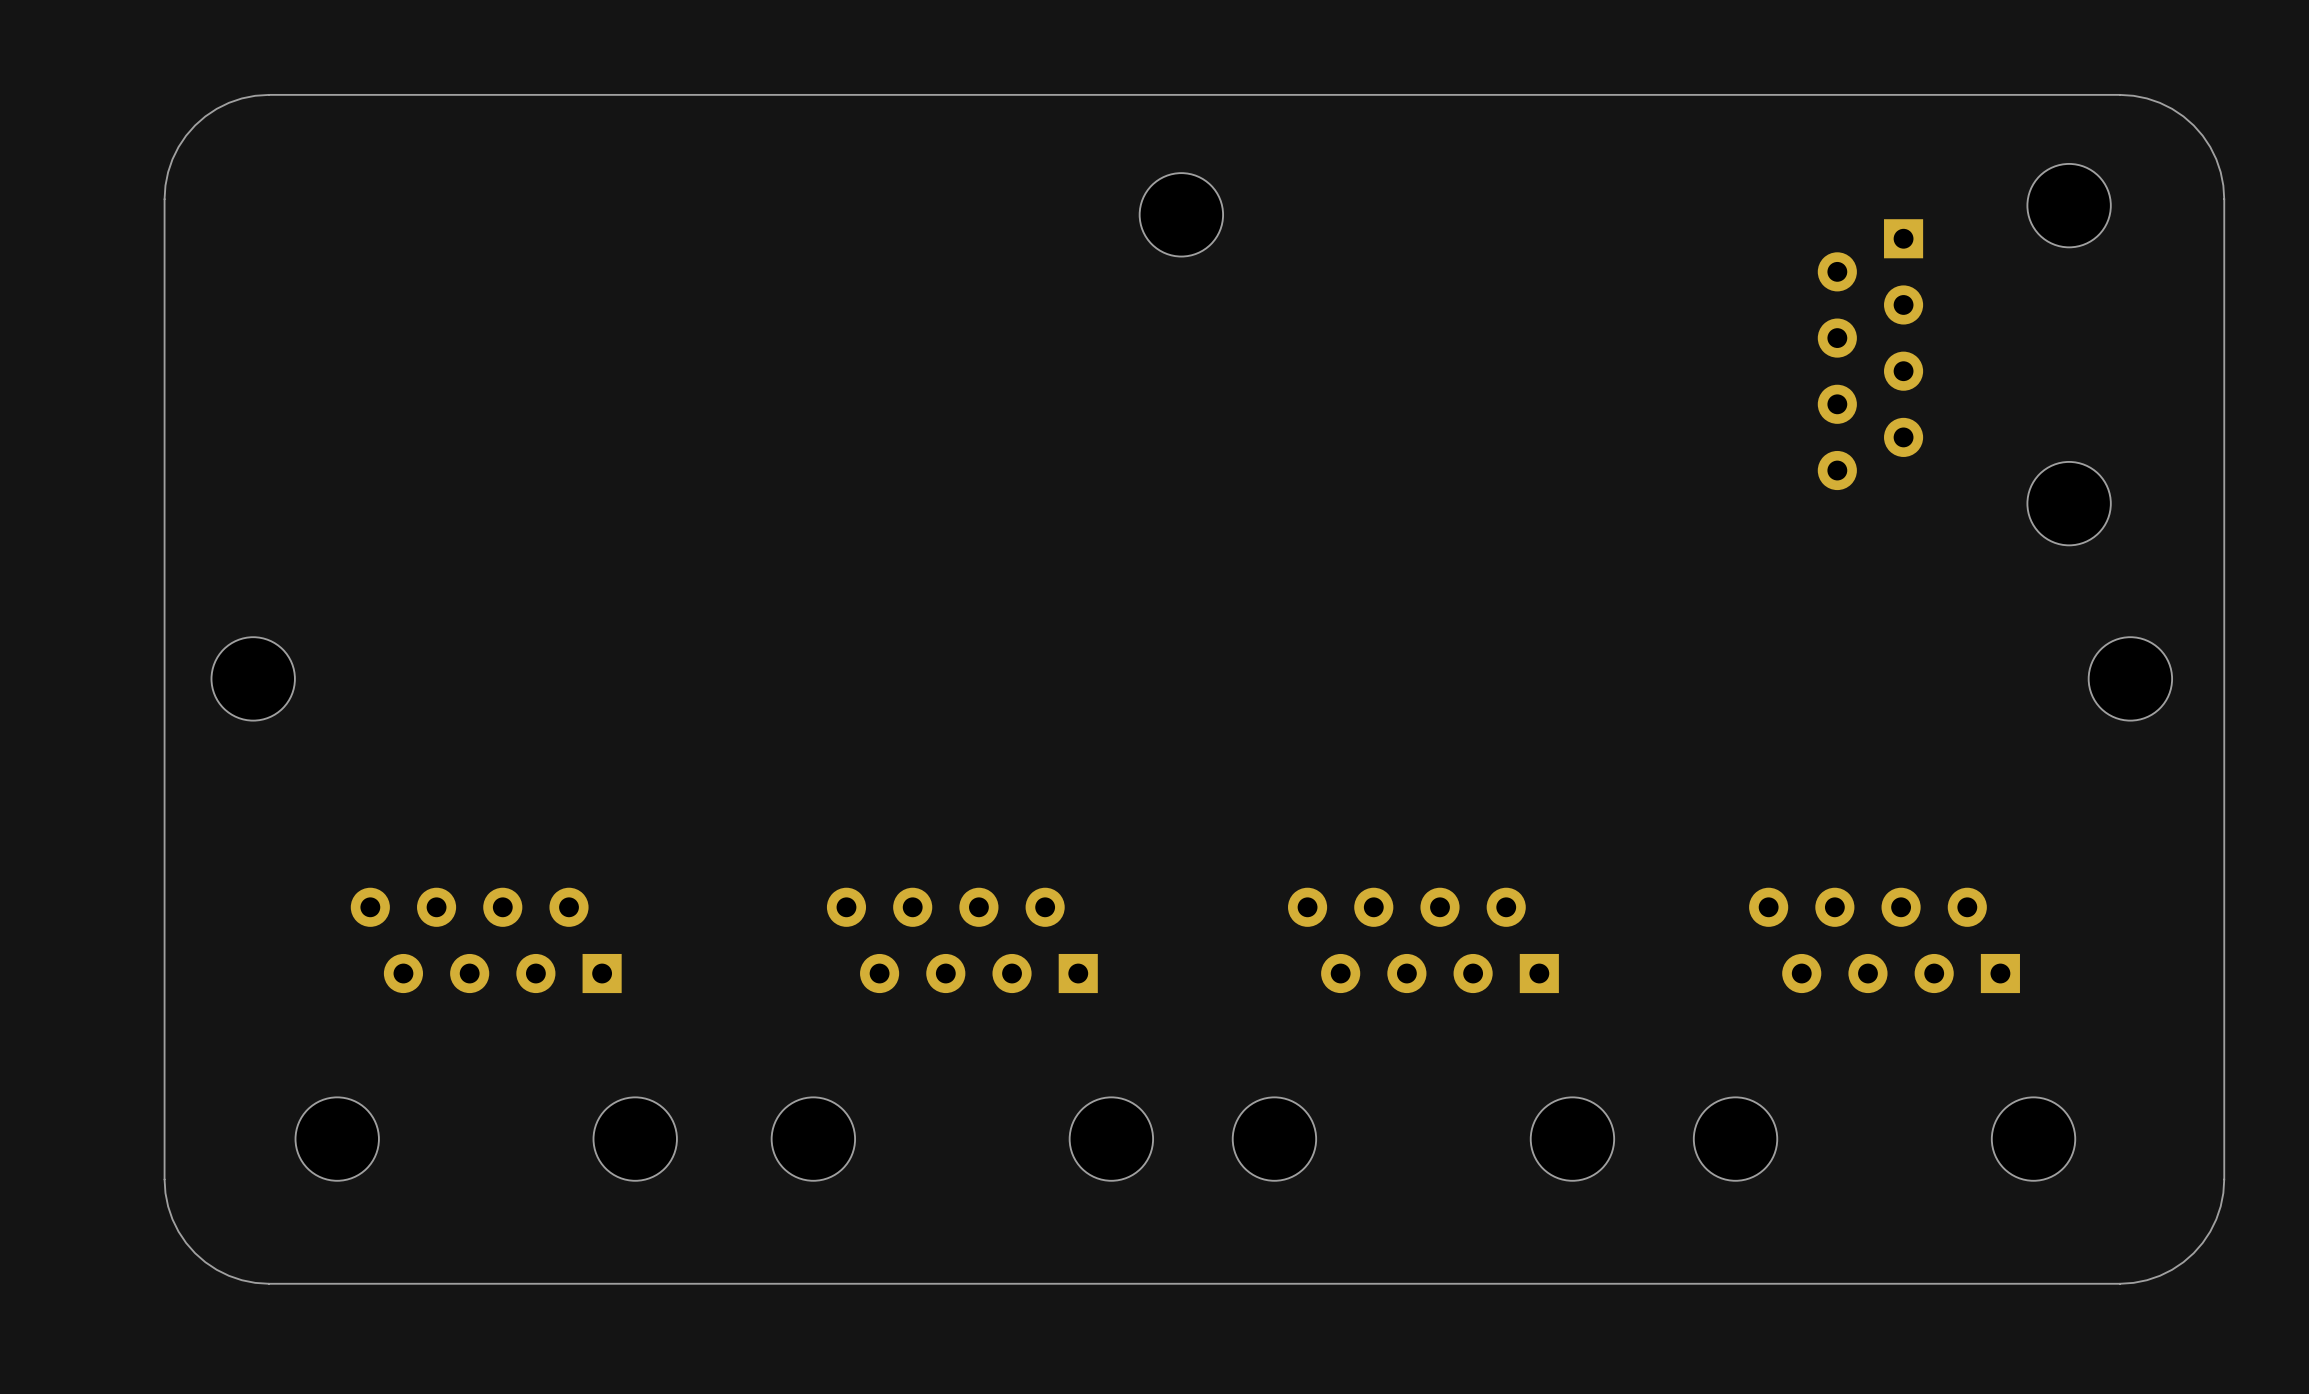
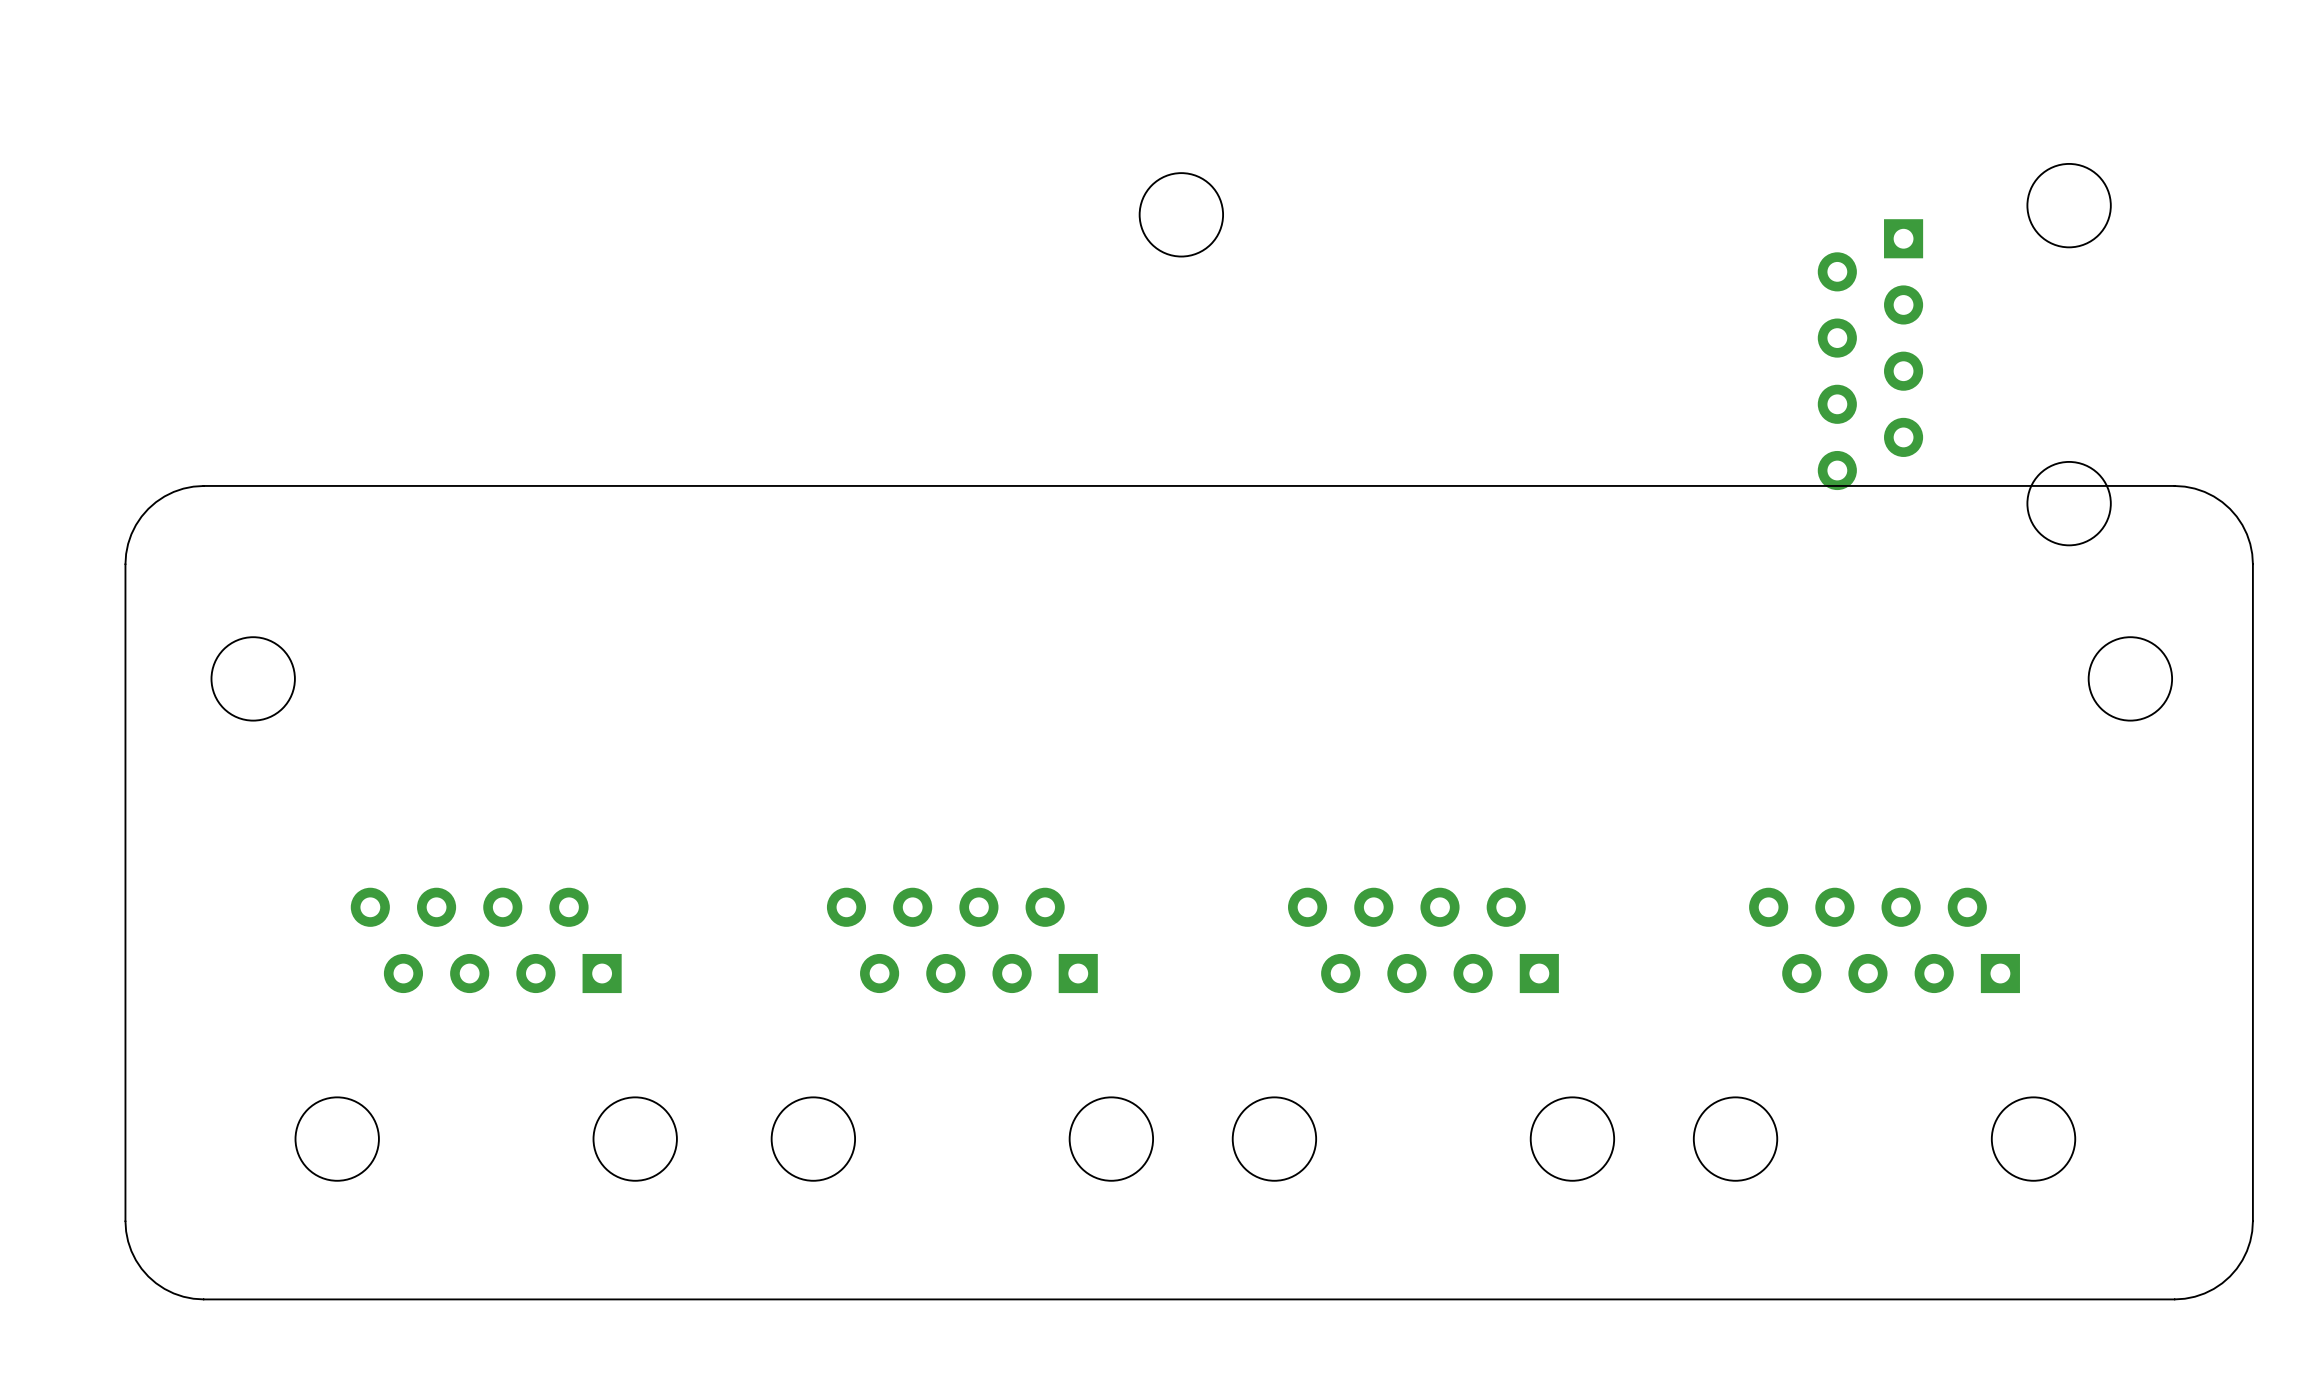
board edge: (2119, 94) (268, 94) (241, 98) (216, 108) (195, 125) (178, 147) (168, 172) (164, 199) (164, 1179) (168, 1206) (178, 1231) (195, 1253) (216, 1269) (241, 1280) (268, 1283) (2119, 1283) (2146, 1280) (2172, 1269) (2193, 1253) (2210, 1231) (2220, 1206) (2224, 1179) (2224, 199) (2223, 185) (2216, 159) (2210, 147) (2193, 125) (2183, 116) (2159, 102) (2146, 98) (2119, 94) -> (2174, 485) (2204, 491) (2230, 508) (2246, 534) (2252, 564) (2252, 1231) (2246, 1251) (2236, 1268) (2222, 1283) (2204, 1293) (2174, 1299) (203, 1299) (173, 1293) (156, 1283) (141, 1268) (131, 1251) (125, 1221) (125, 564) (128, 543) (135, 525) (148, 508) (173, 491) (203, 485) (2174, 485)

